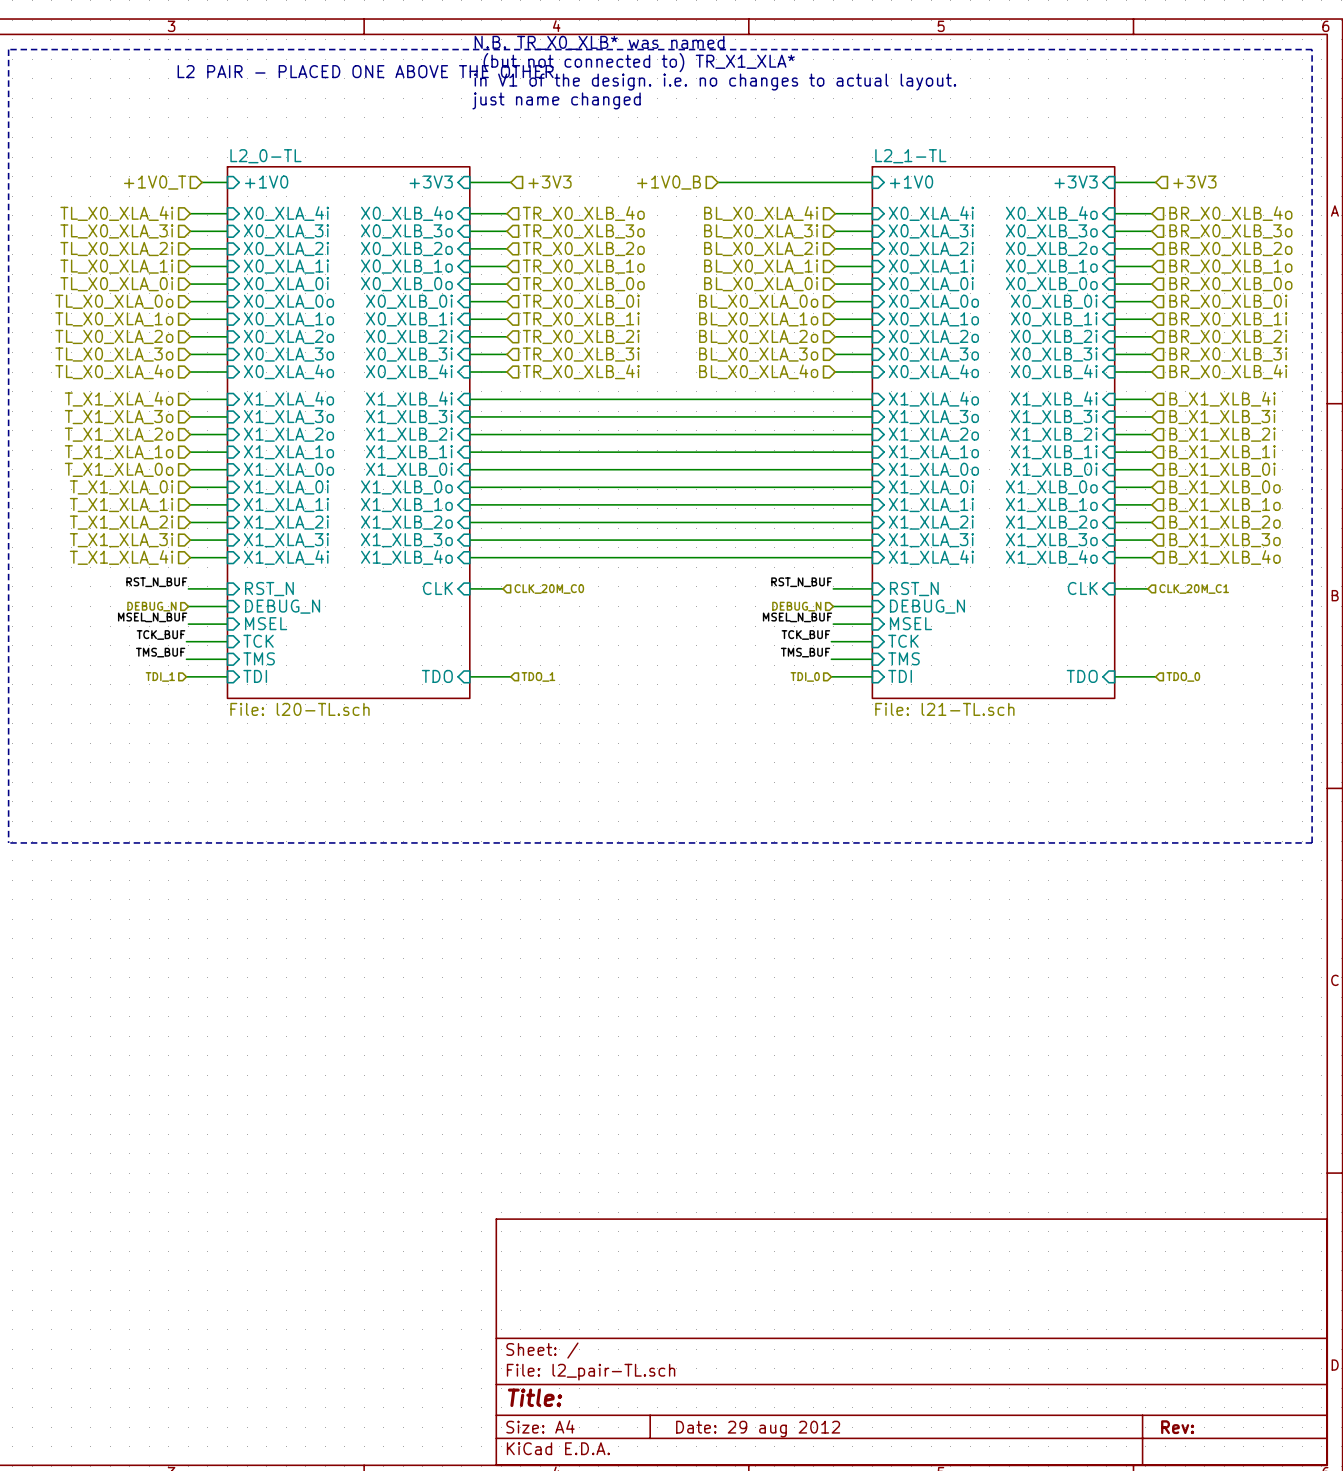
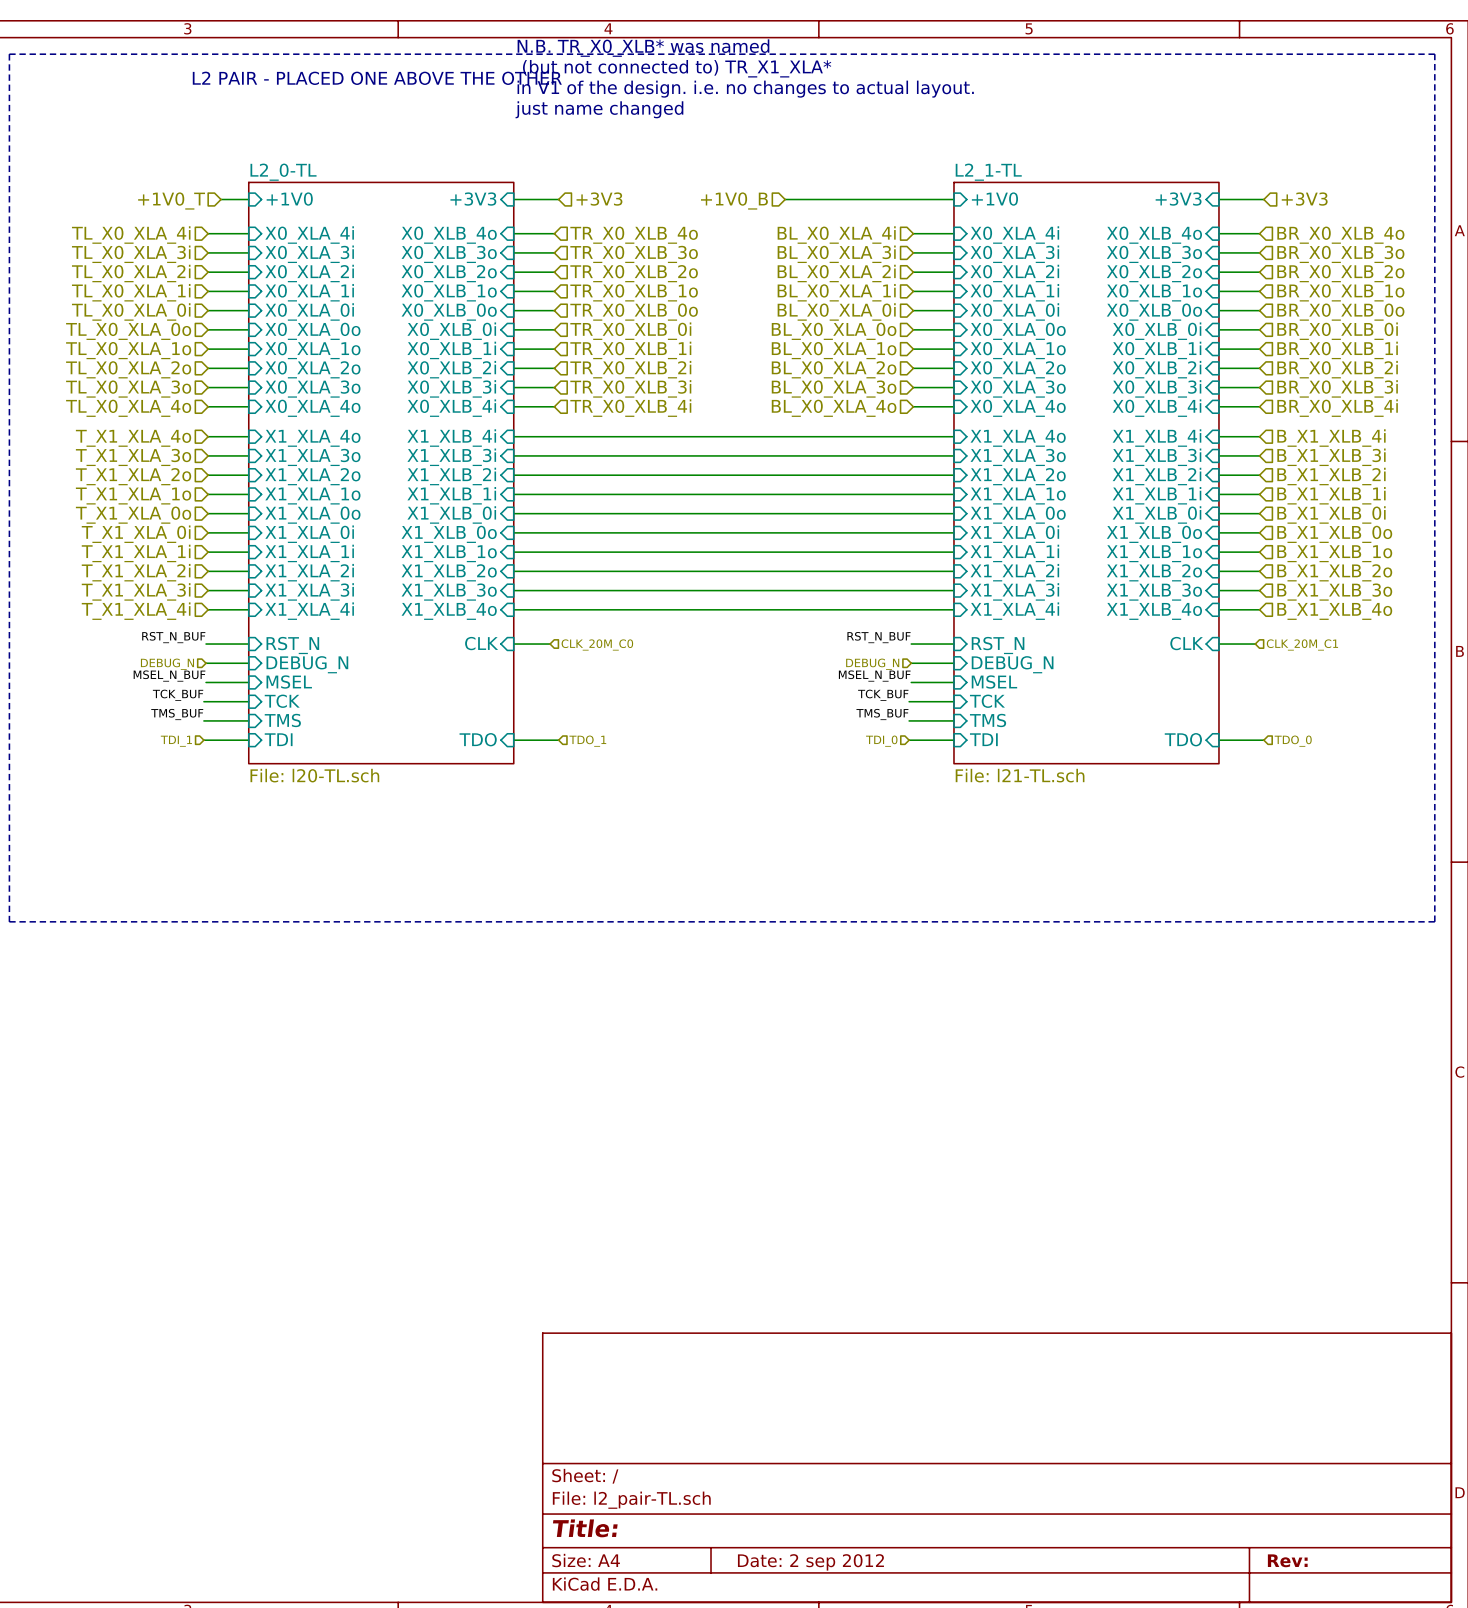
title block: Date: 29 aug 2012 (758, 1429) -> Date: 2 sep 2012 (810, 1562)

